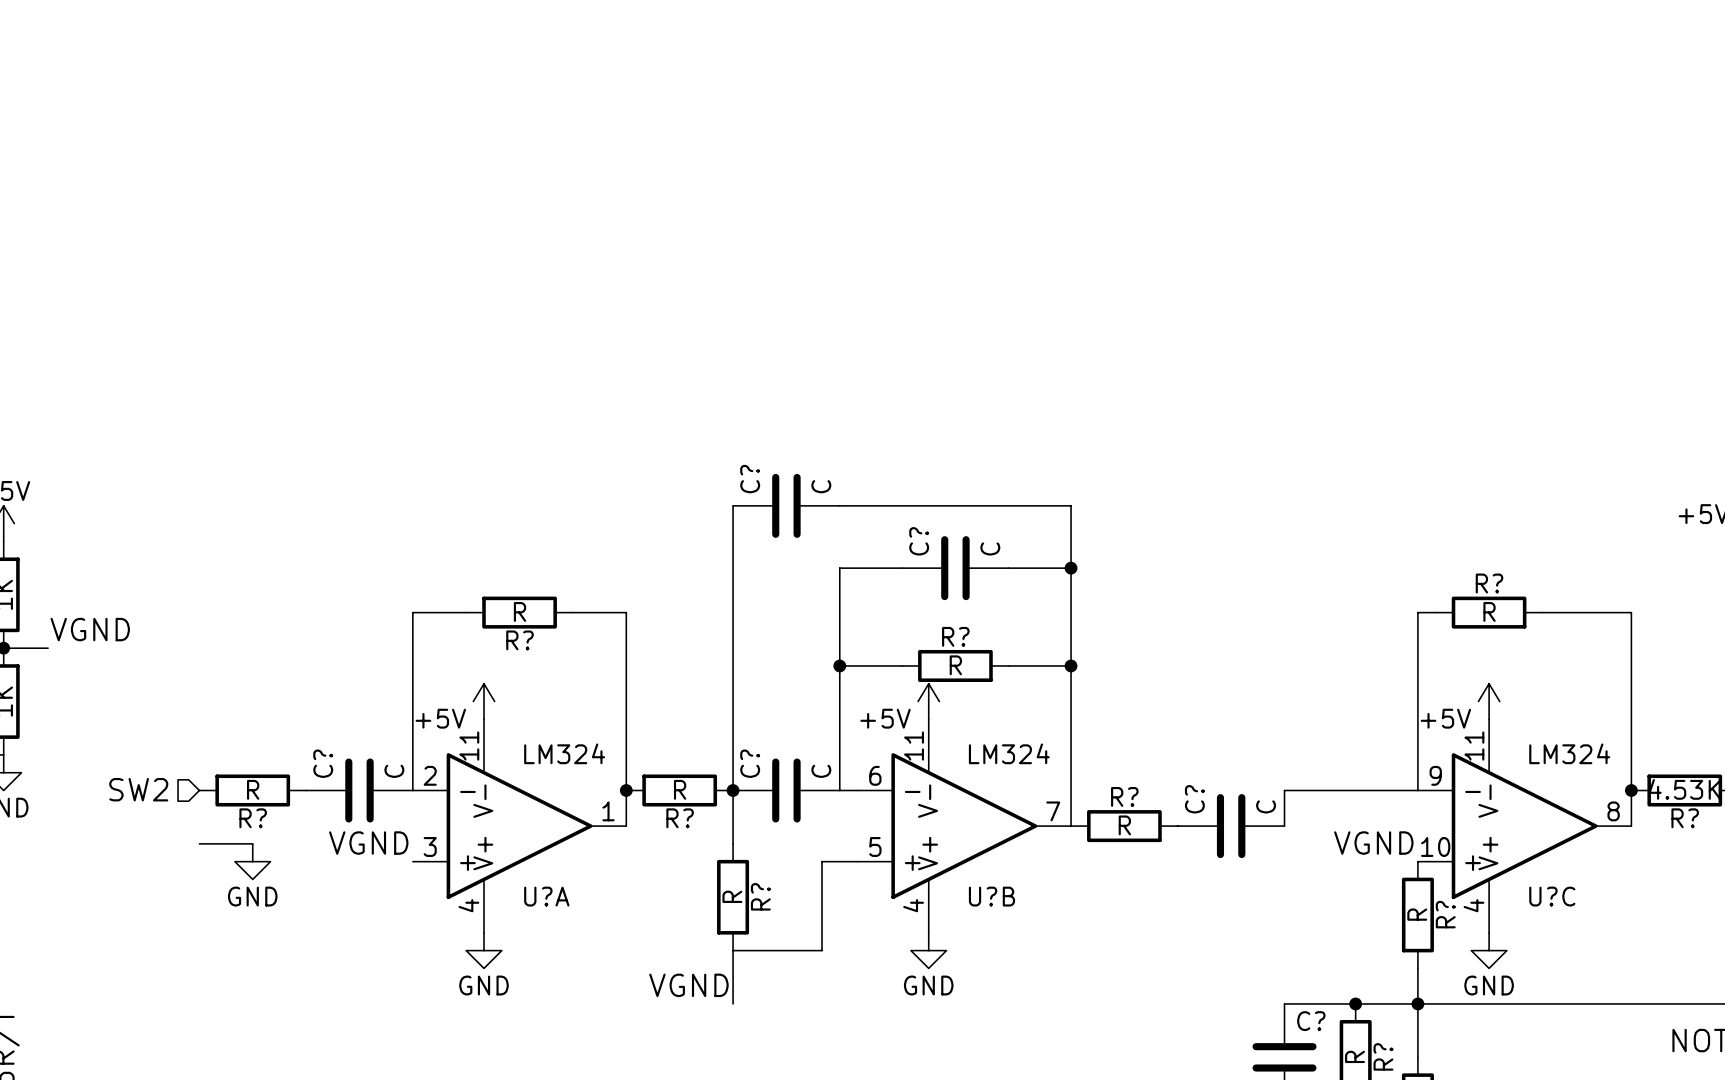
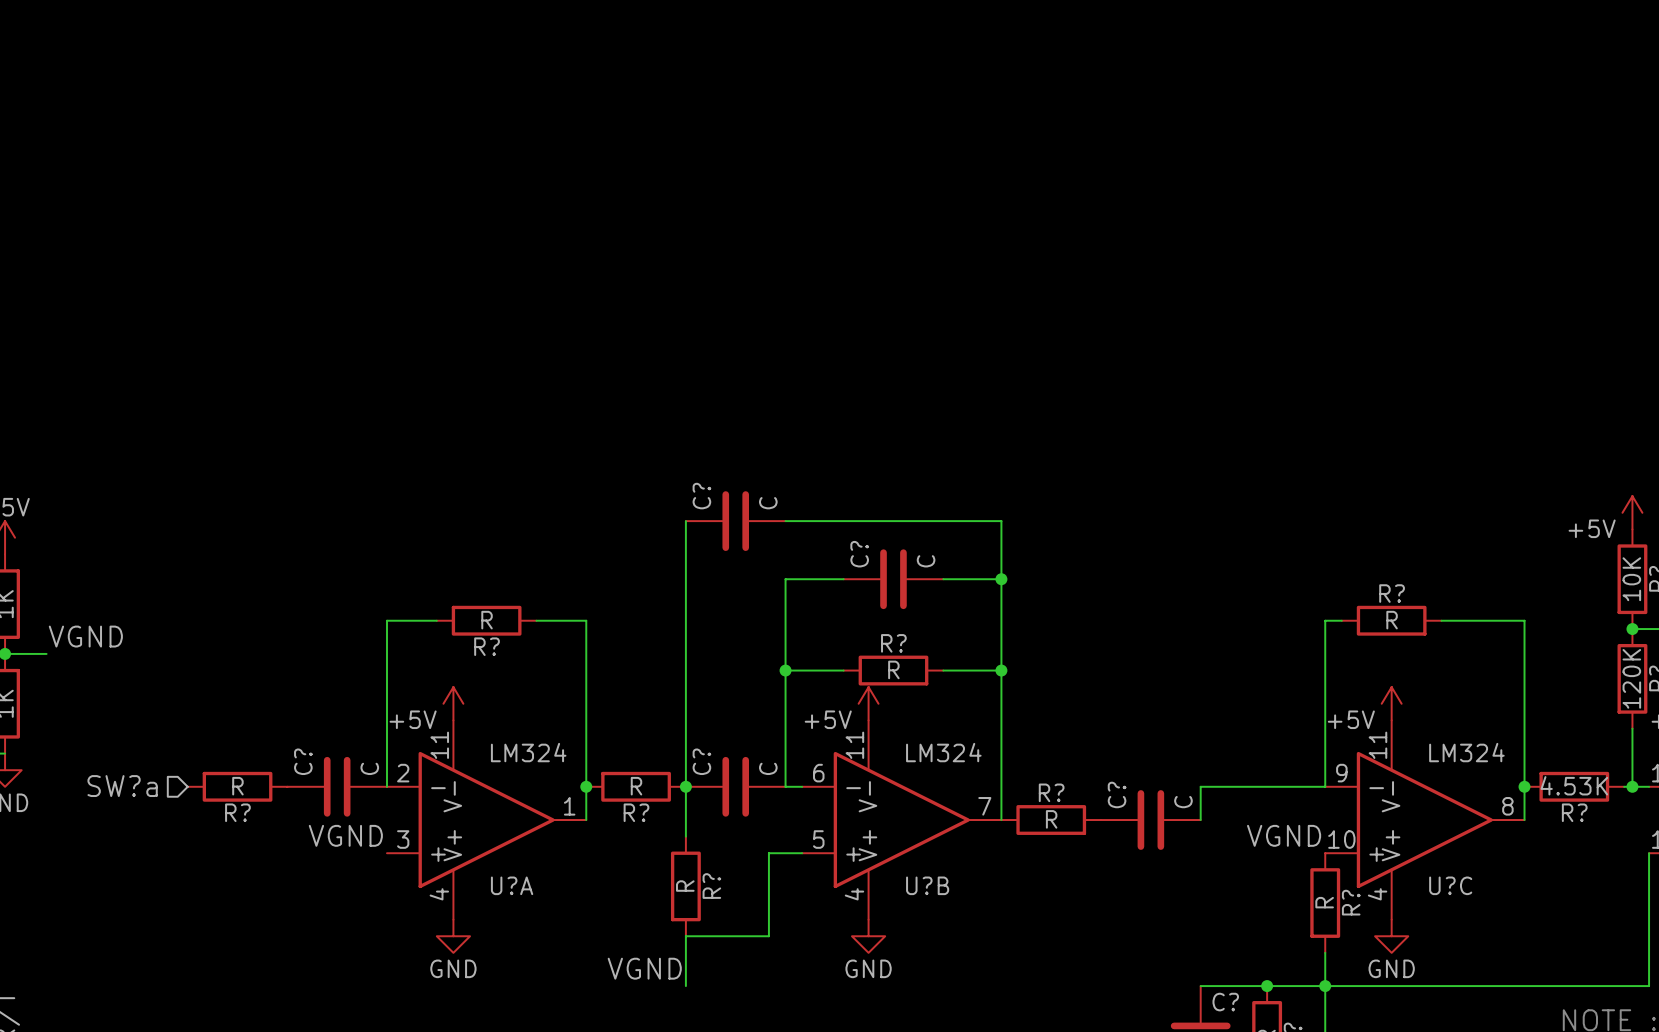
hierarchical label: SW2 (138, 789) -> SW?a (122, 786)
wire: (199, 843) (252, 843) -> none
power symbol: GND (252, 861) -> none

